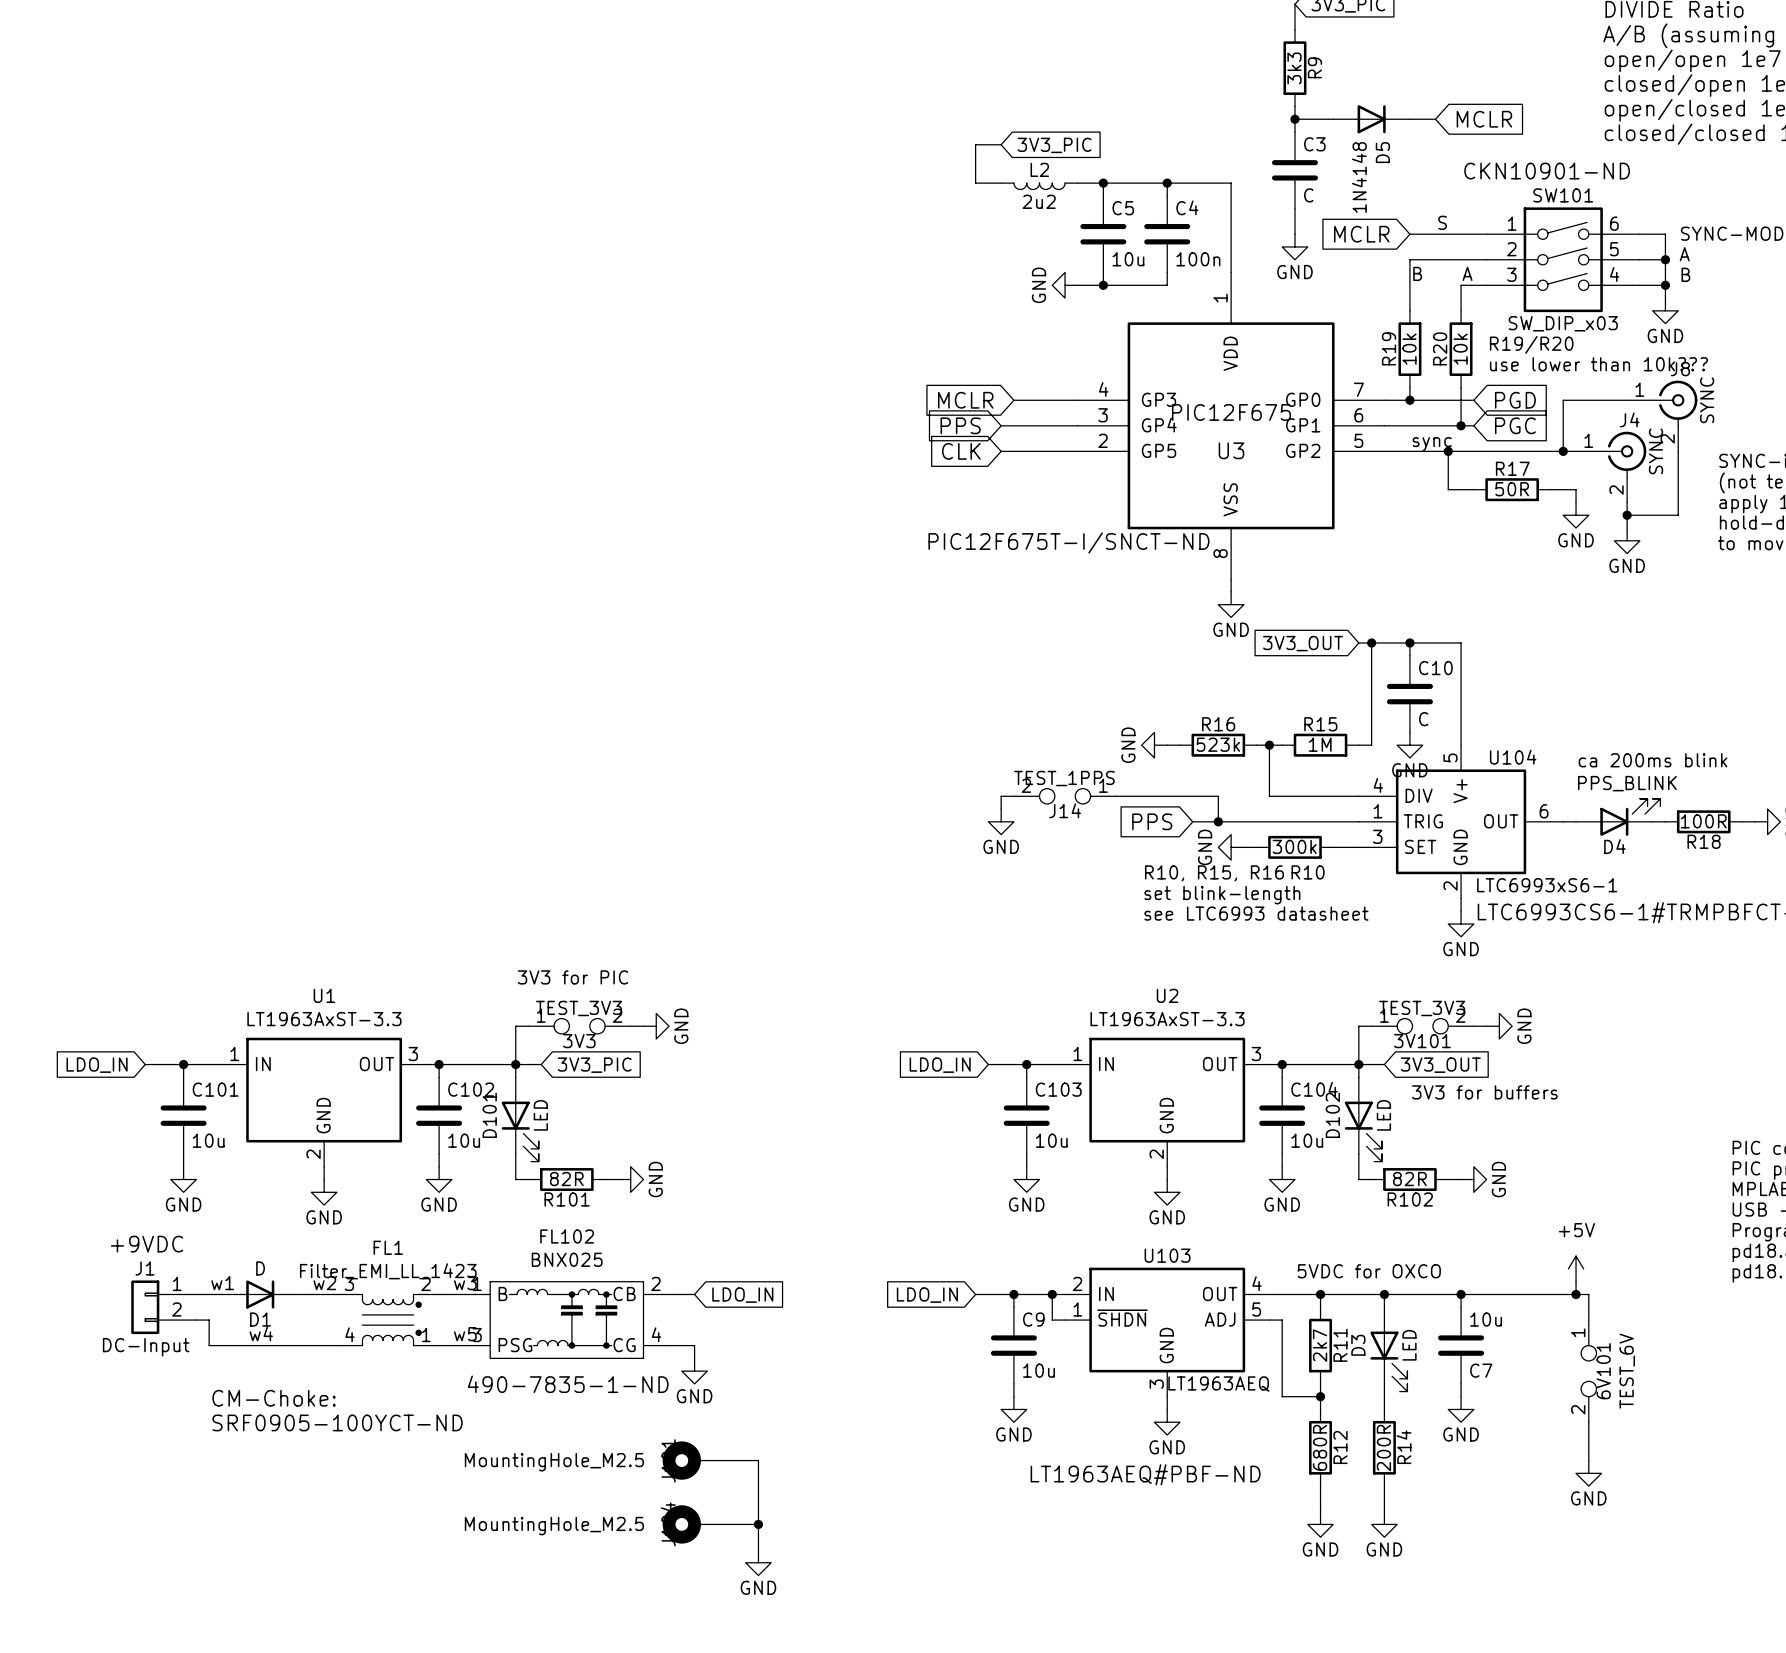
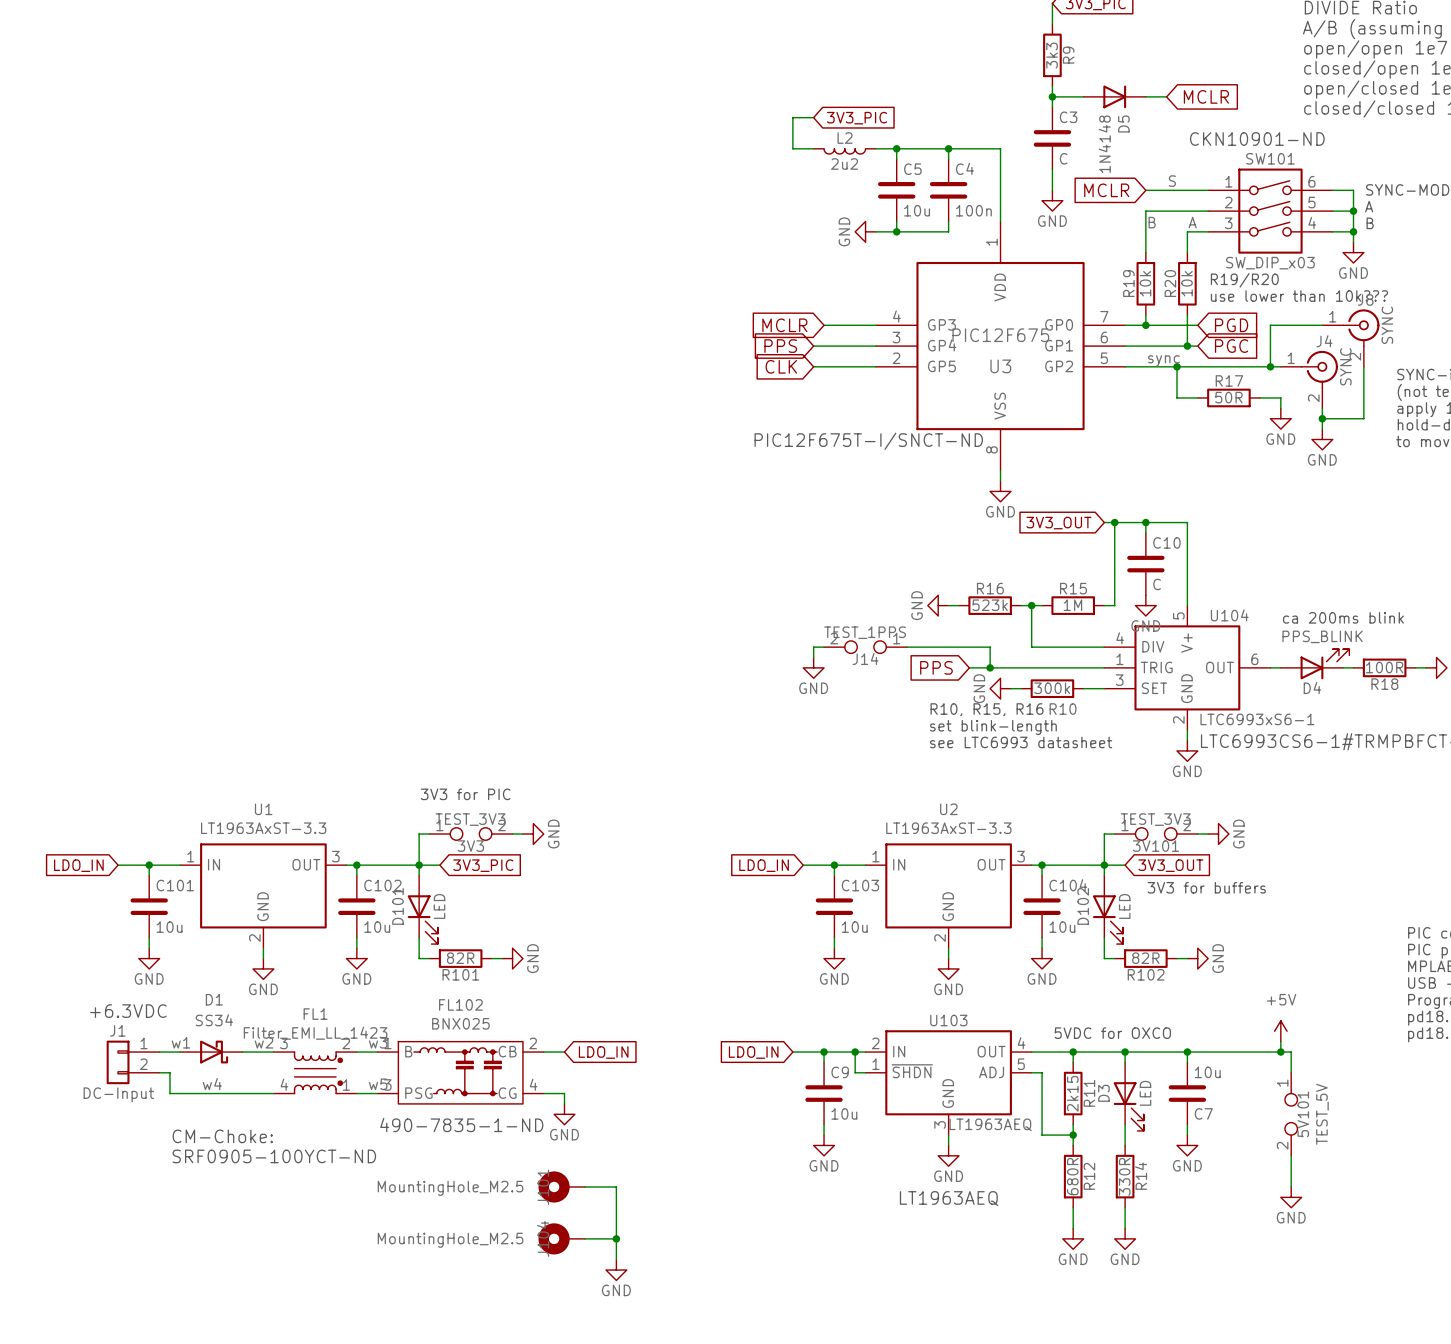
text: +9VDC (147, 1244) -> +6.3VDC (128, 1011)
D1 value: D (260, 1268) -> SS34 (214, 1020)
D1 symbol: [221, 1280, 299, 1309] -> [180, 1040, 243, 1064]
D1 name position: D1 (260, 1319) -> D1 (214, 999)
R11 value: 2k7 (1320, 1345) -> 2k15 (1072, 1093)
6V101 name: 6V101 (1603, 1371) -> 5V101 (1303, 1114)
6V101 value: TEST_6V (1627, 1371) -> TEST_5V (1322, 1114)
R14 value: 200R (1383, 1448) -> 330R (1124, 1176)
text: LT1963AEQ#PBF-ND (1145, 1474) -> LT1963AEQ (949, 1198)

